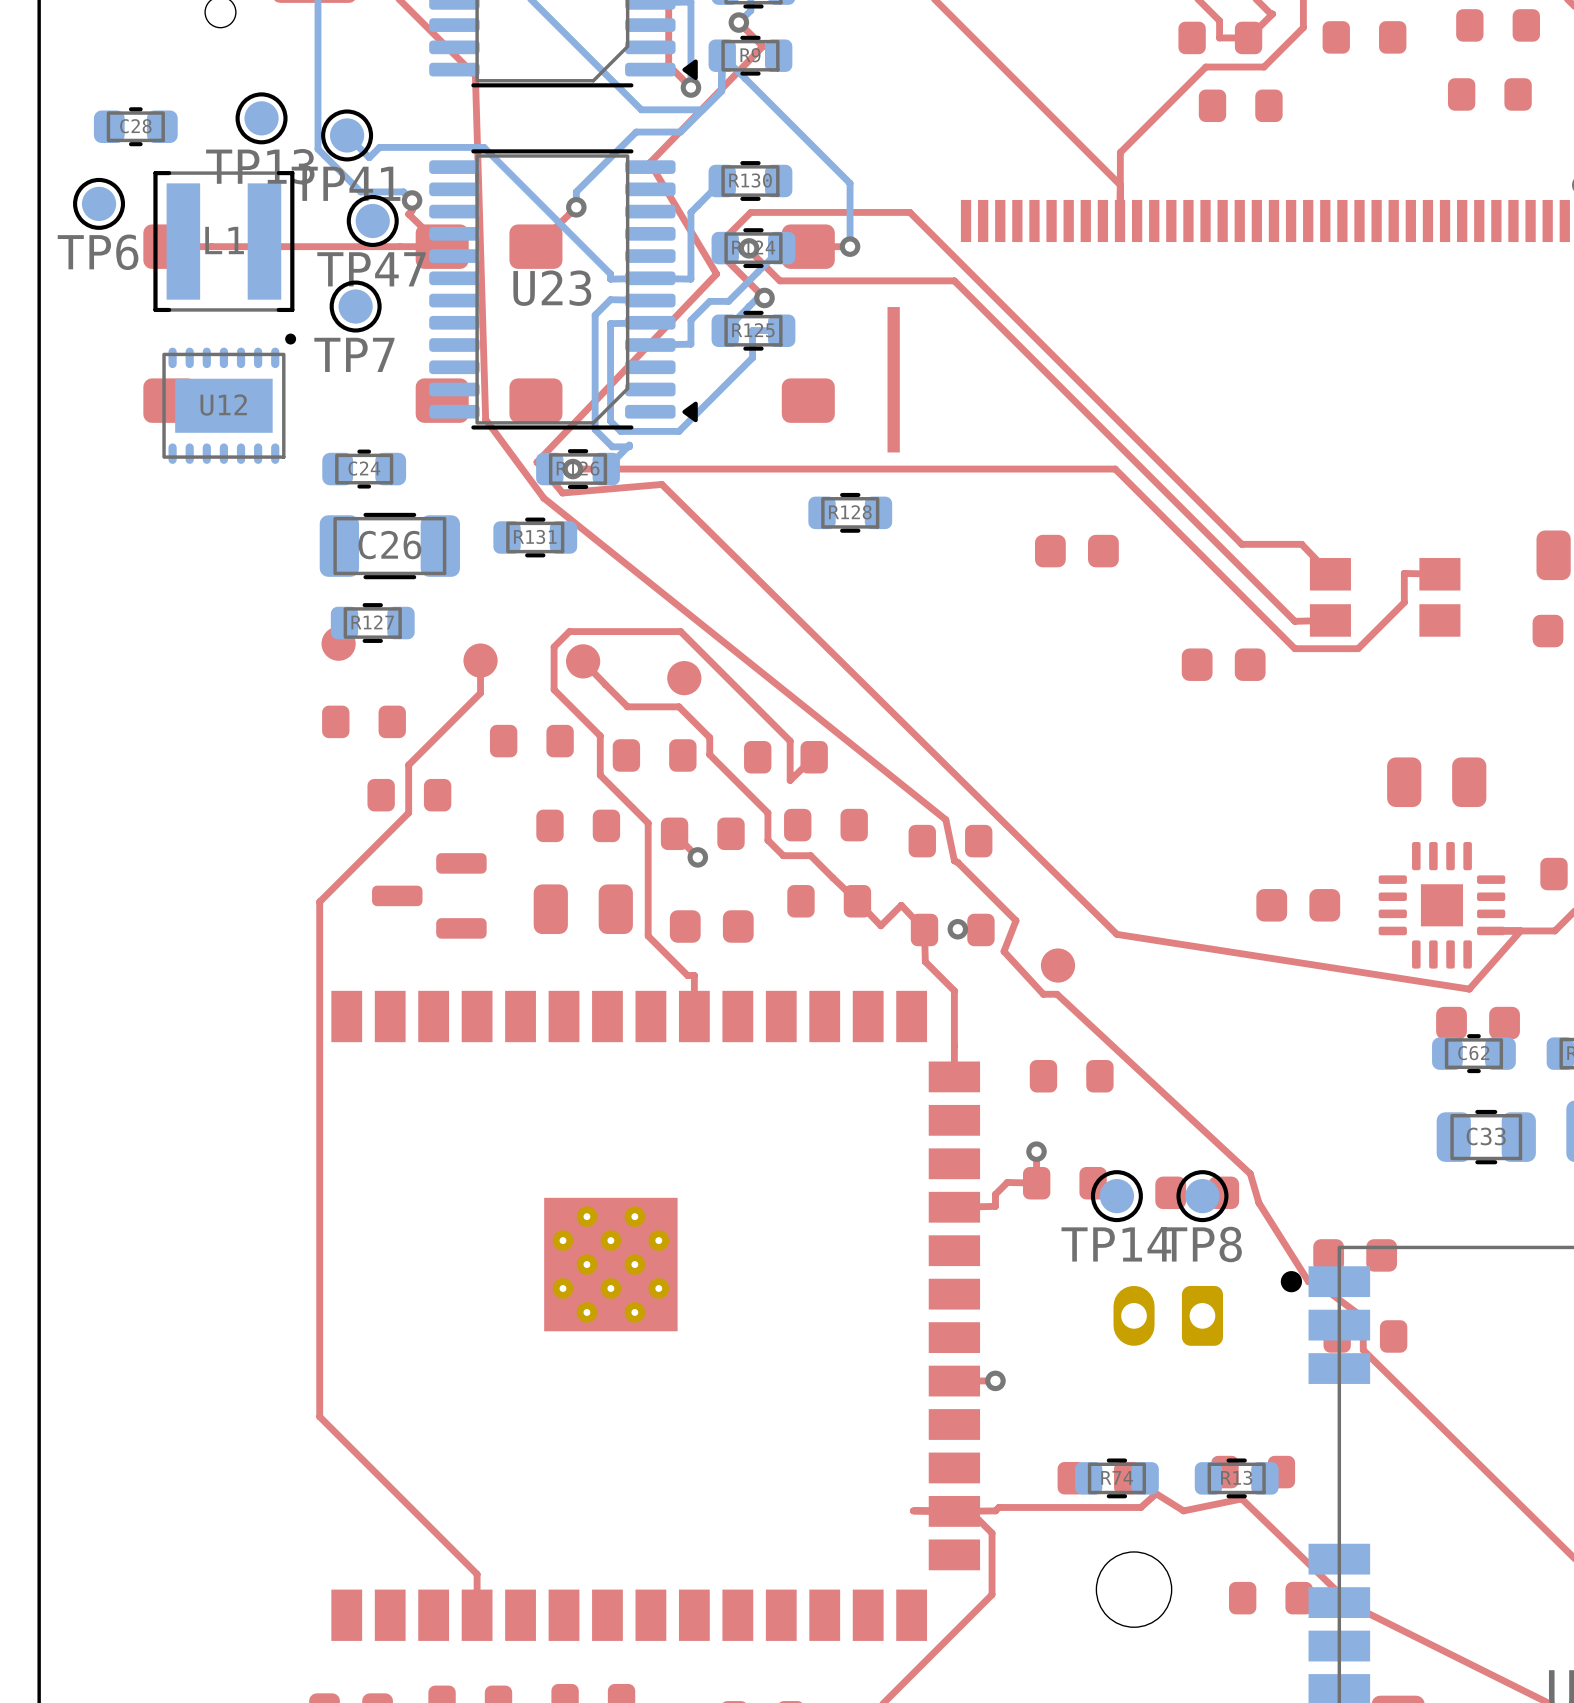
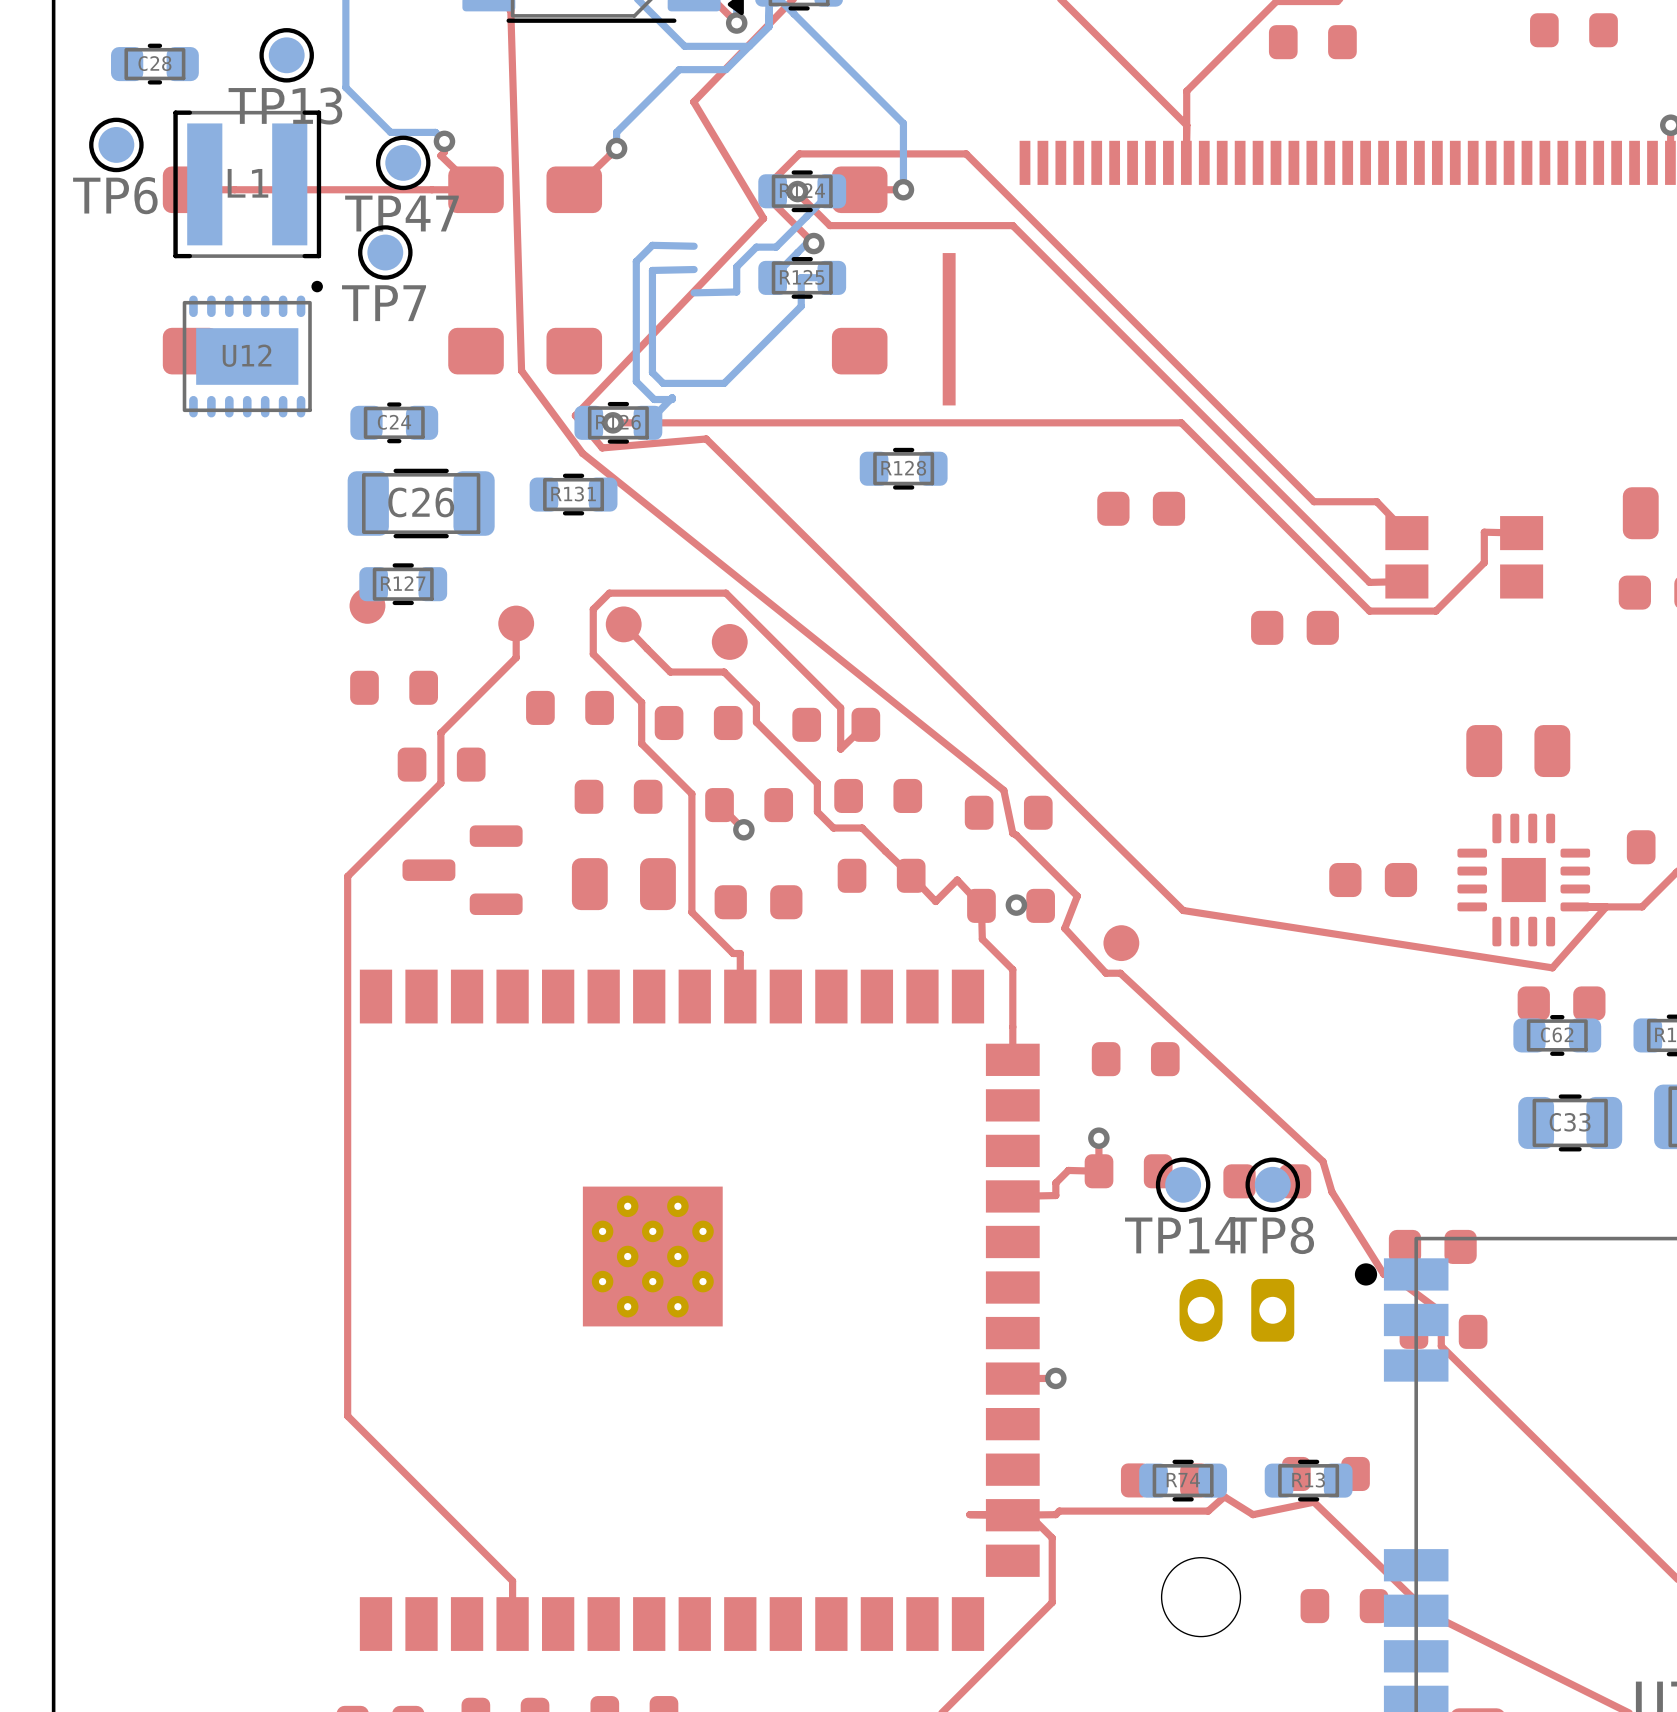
bottom track: (347, 135) (369, 157) (379, 147) (483, 147) (610, 274) (610, 279) (690, 279) (690, 212) (722, 181) -> none
TP41: (347, 135) -> none
R130: (750, 181) -> none
U23: (563, 289) -> none

